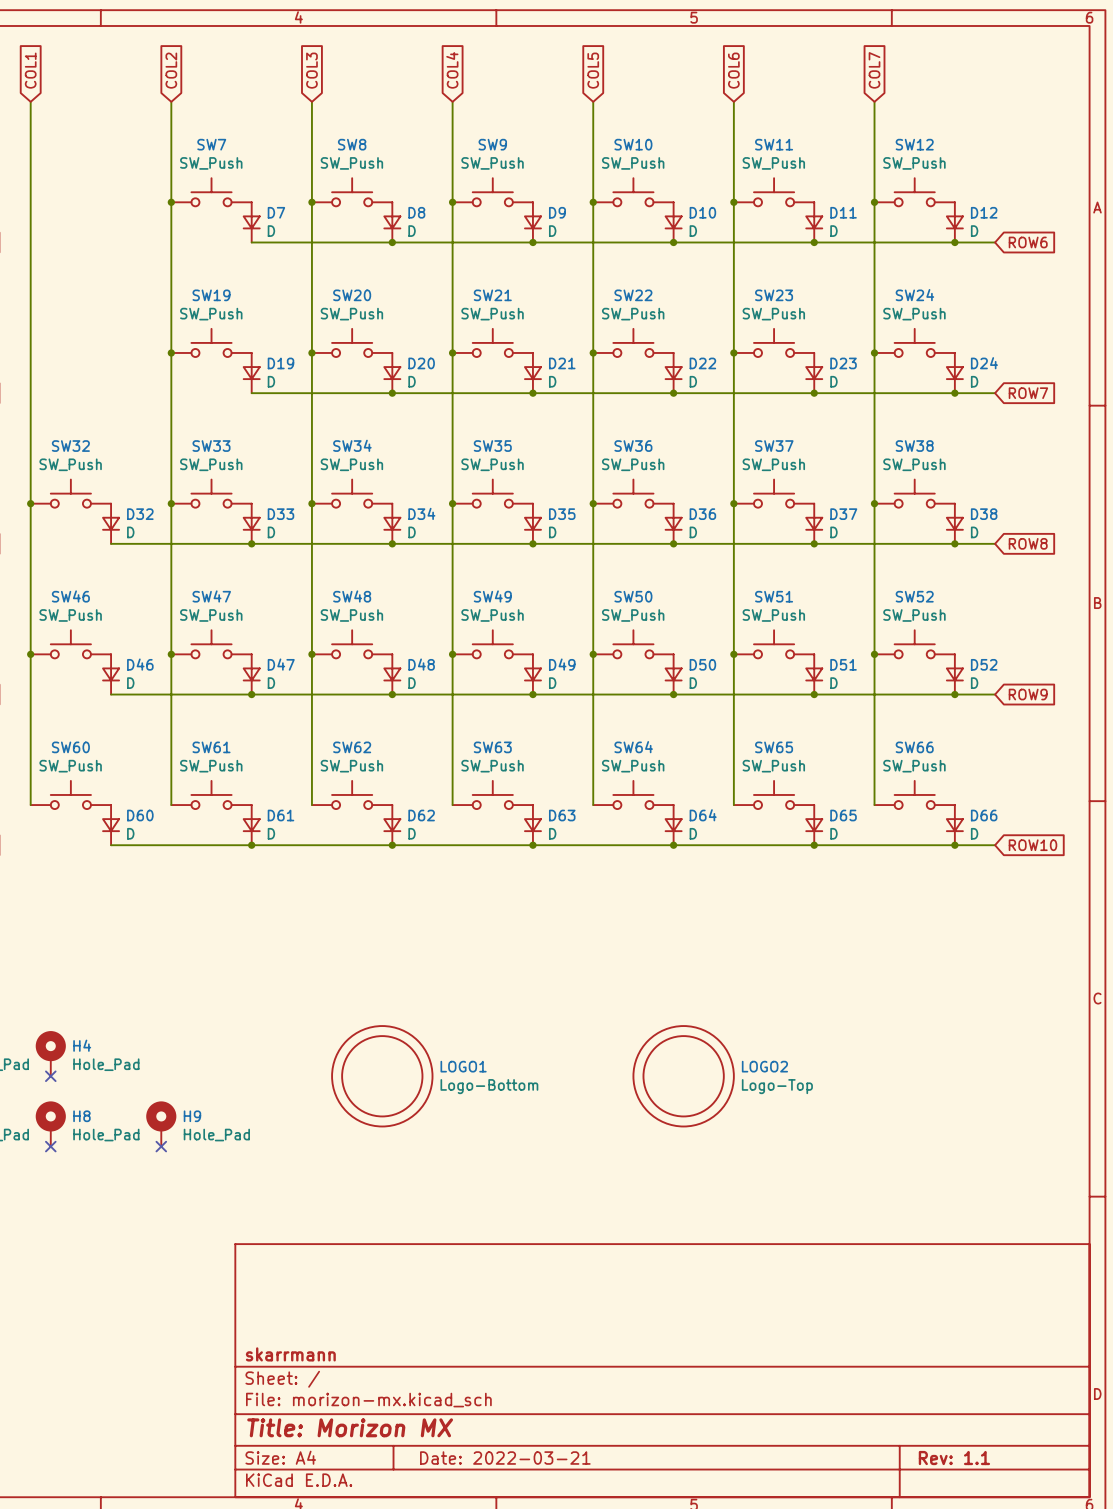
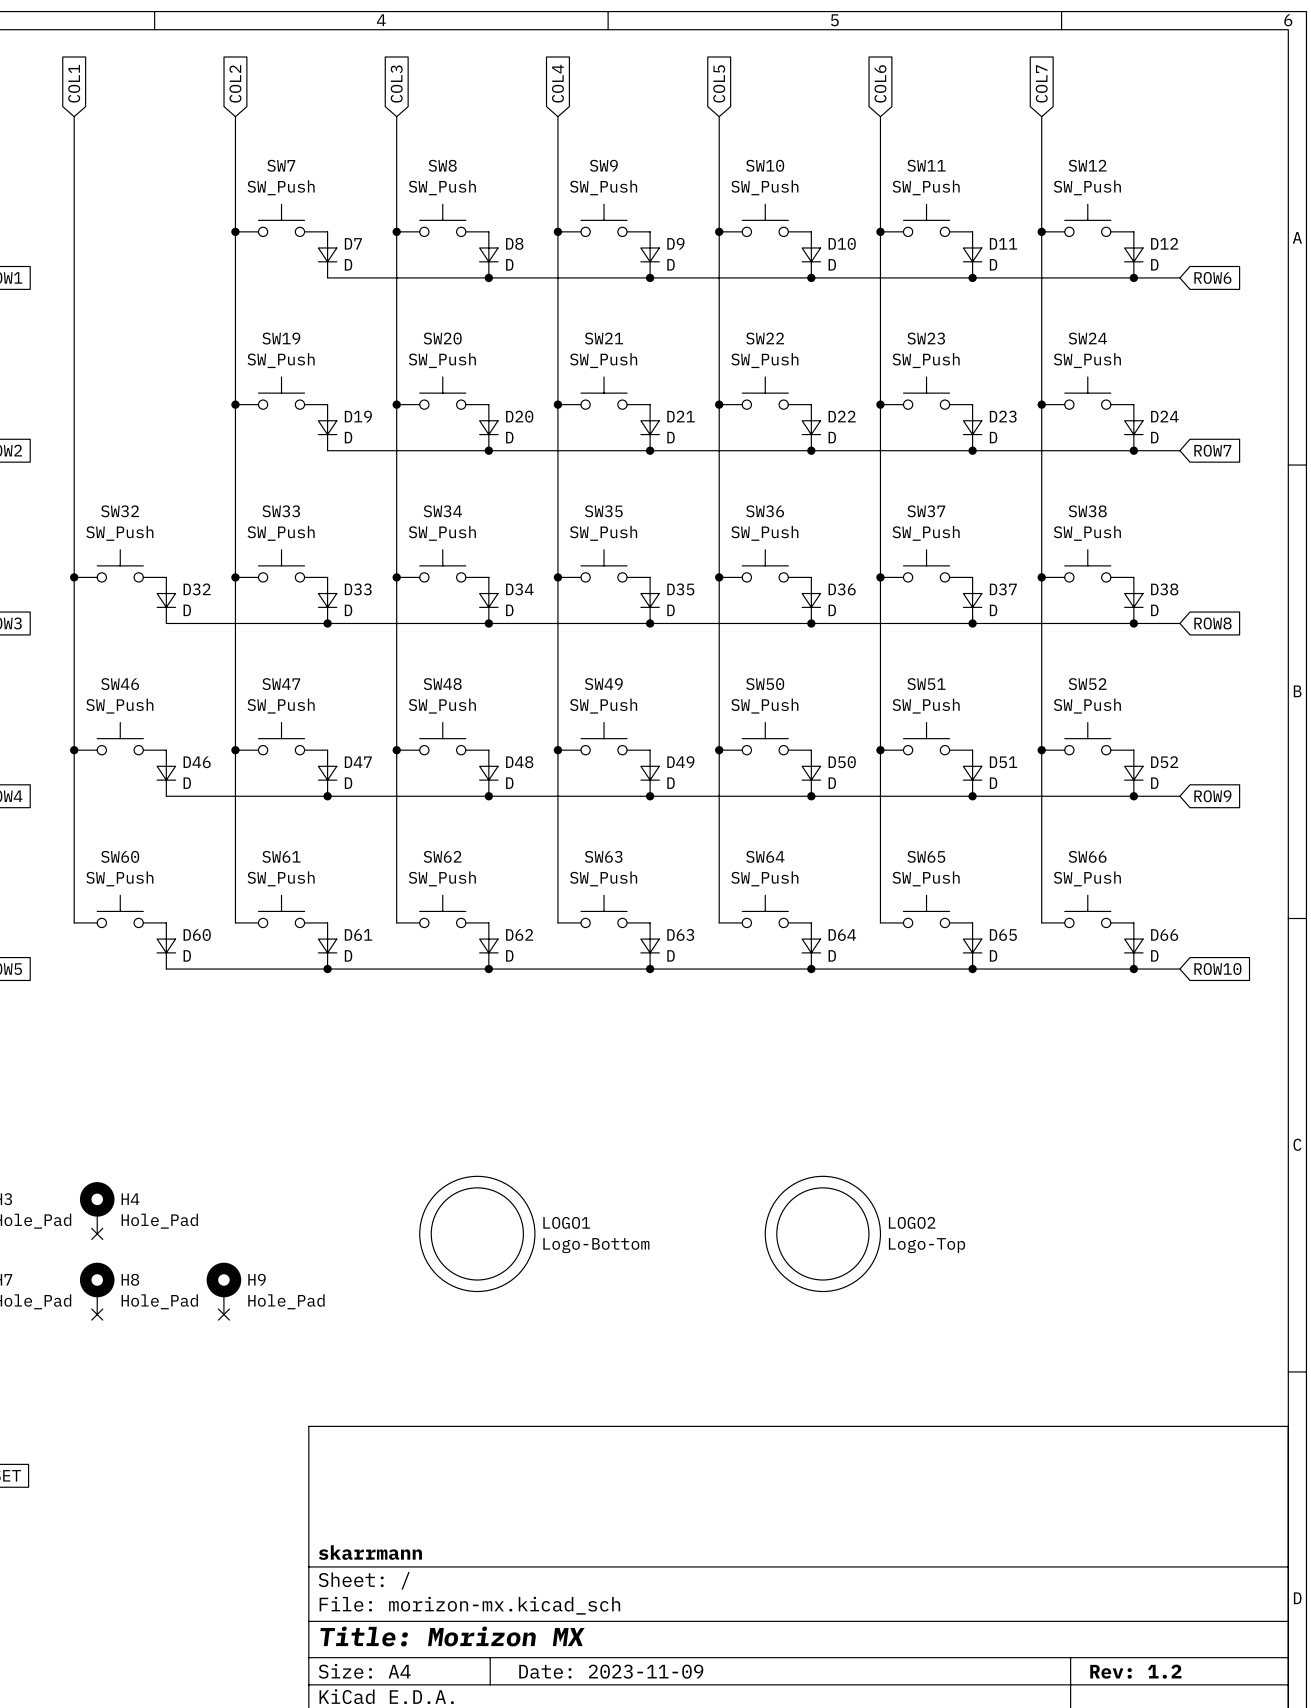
title block: Date: 2022-03-21 (505, 1458) -> Date: 2023-11-09 (611, 1671)
title block: Rev: 1.1 (954, 1458) -> Rev: 1.2 (1135, 1671)

